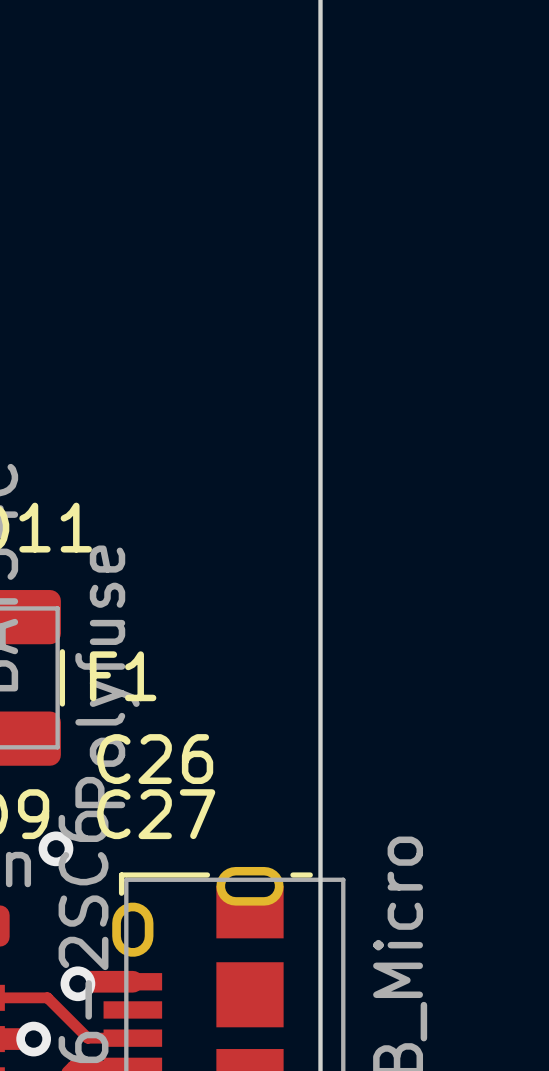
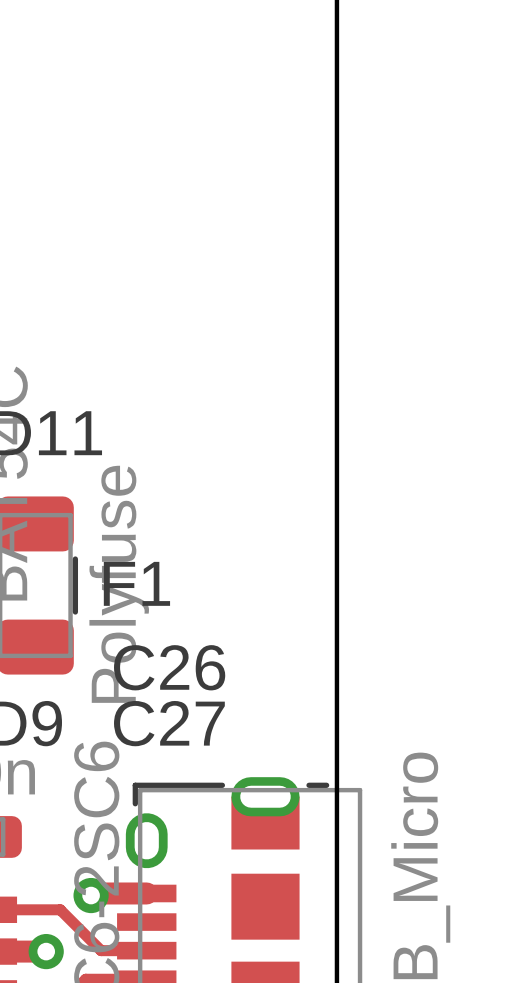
via: (55, 848) -> none

